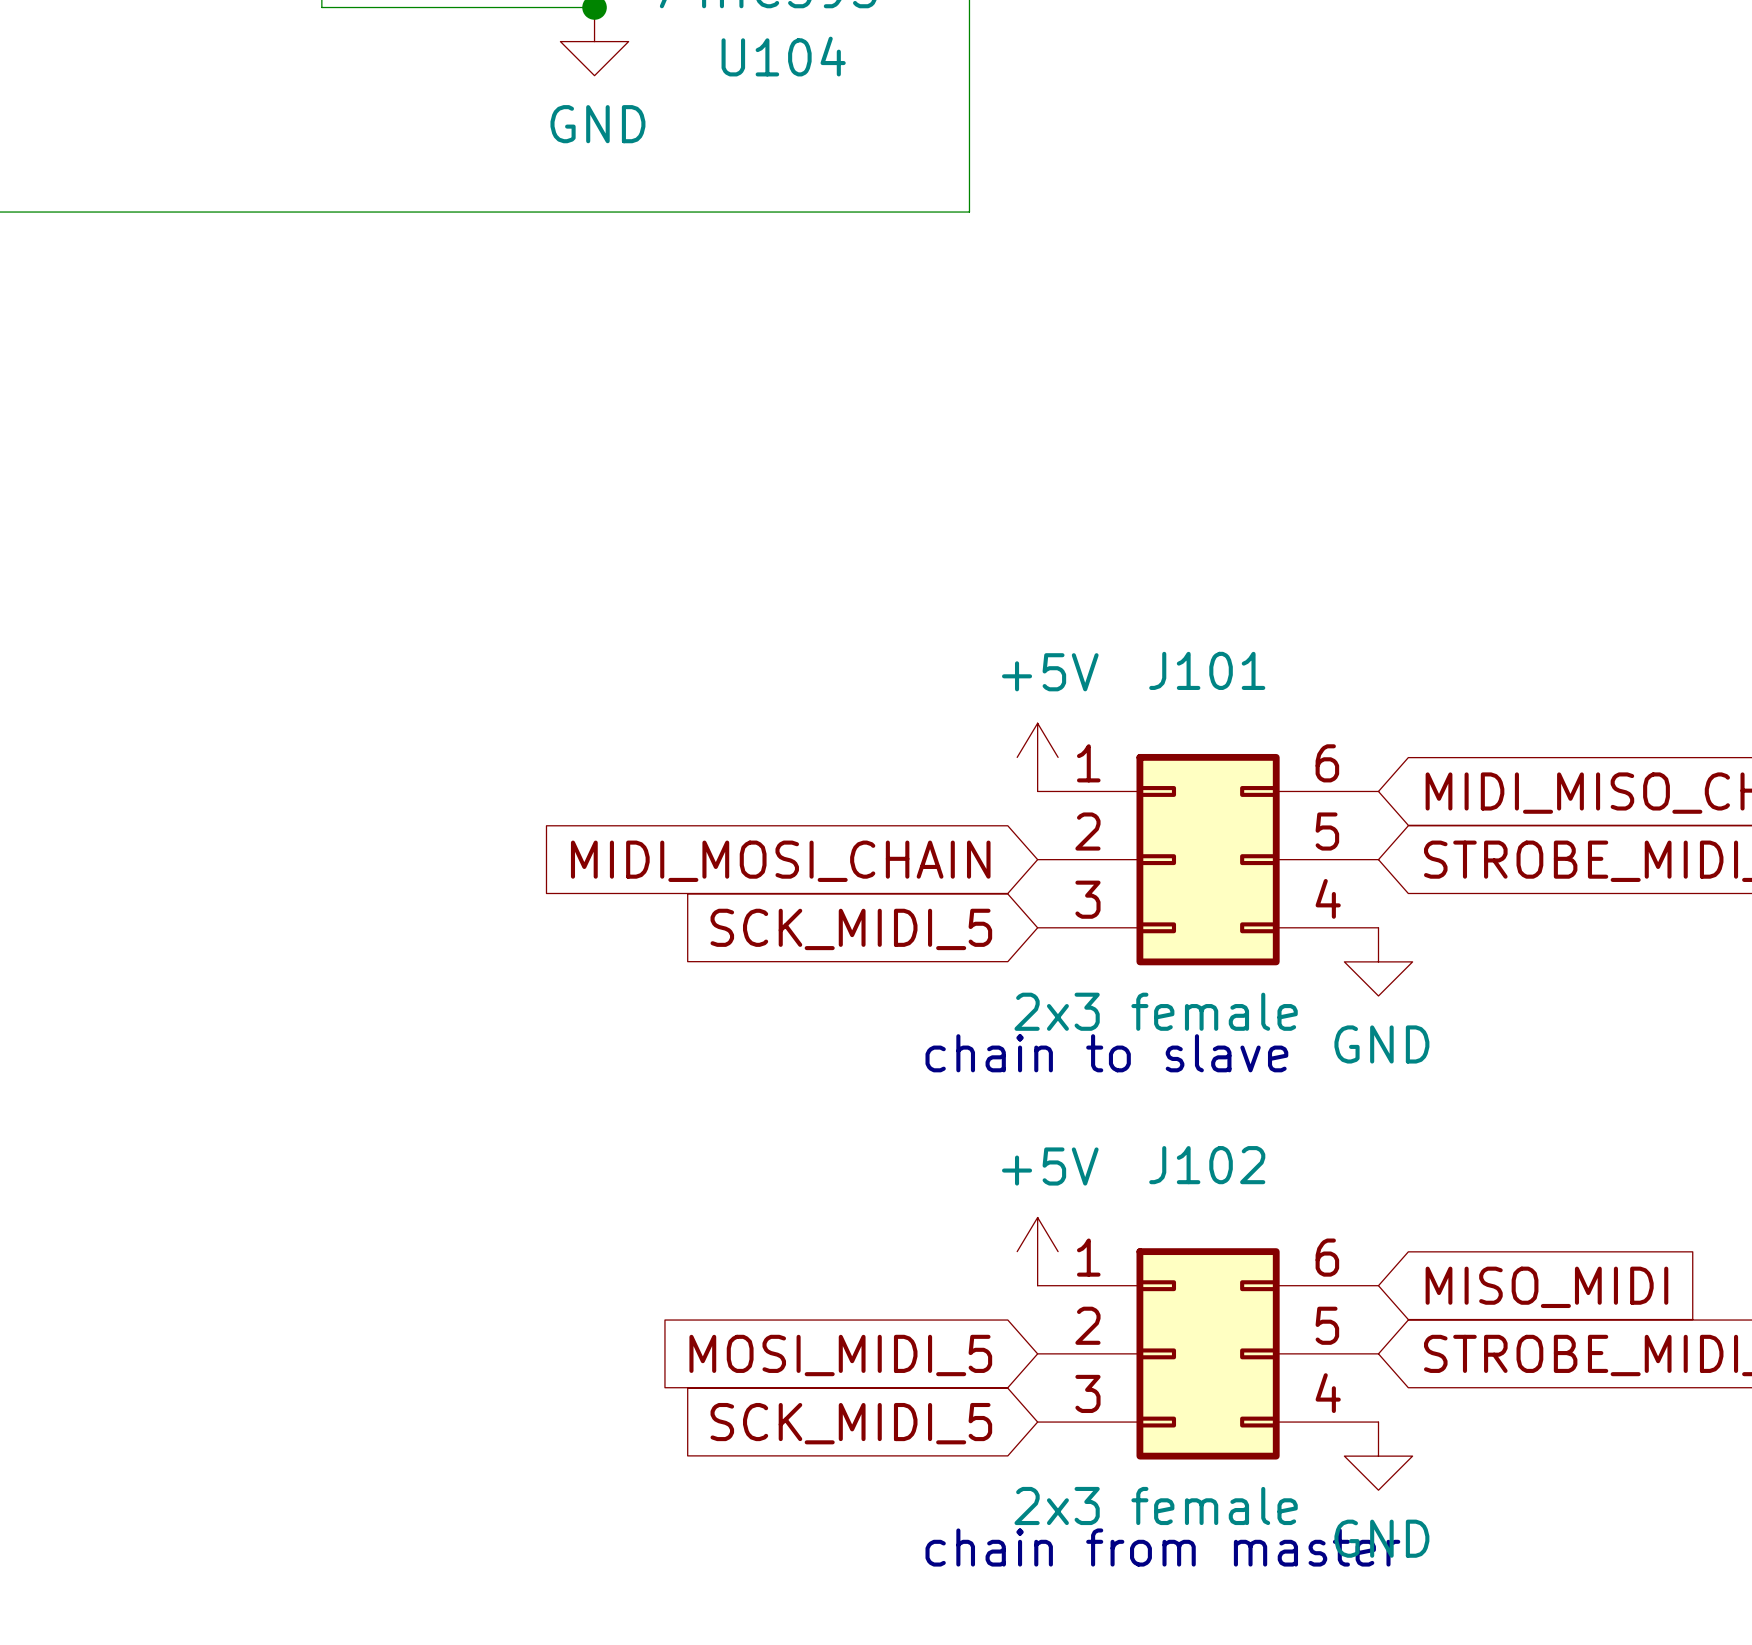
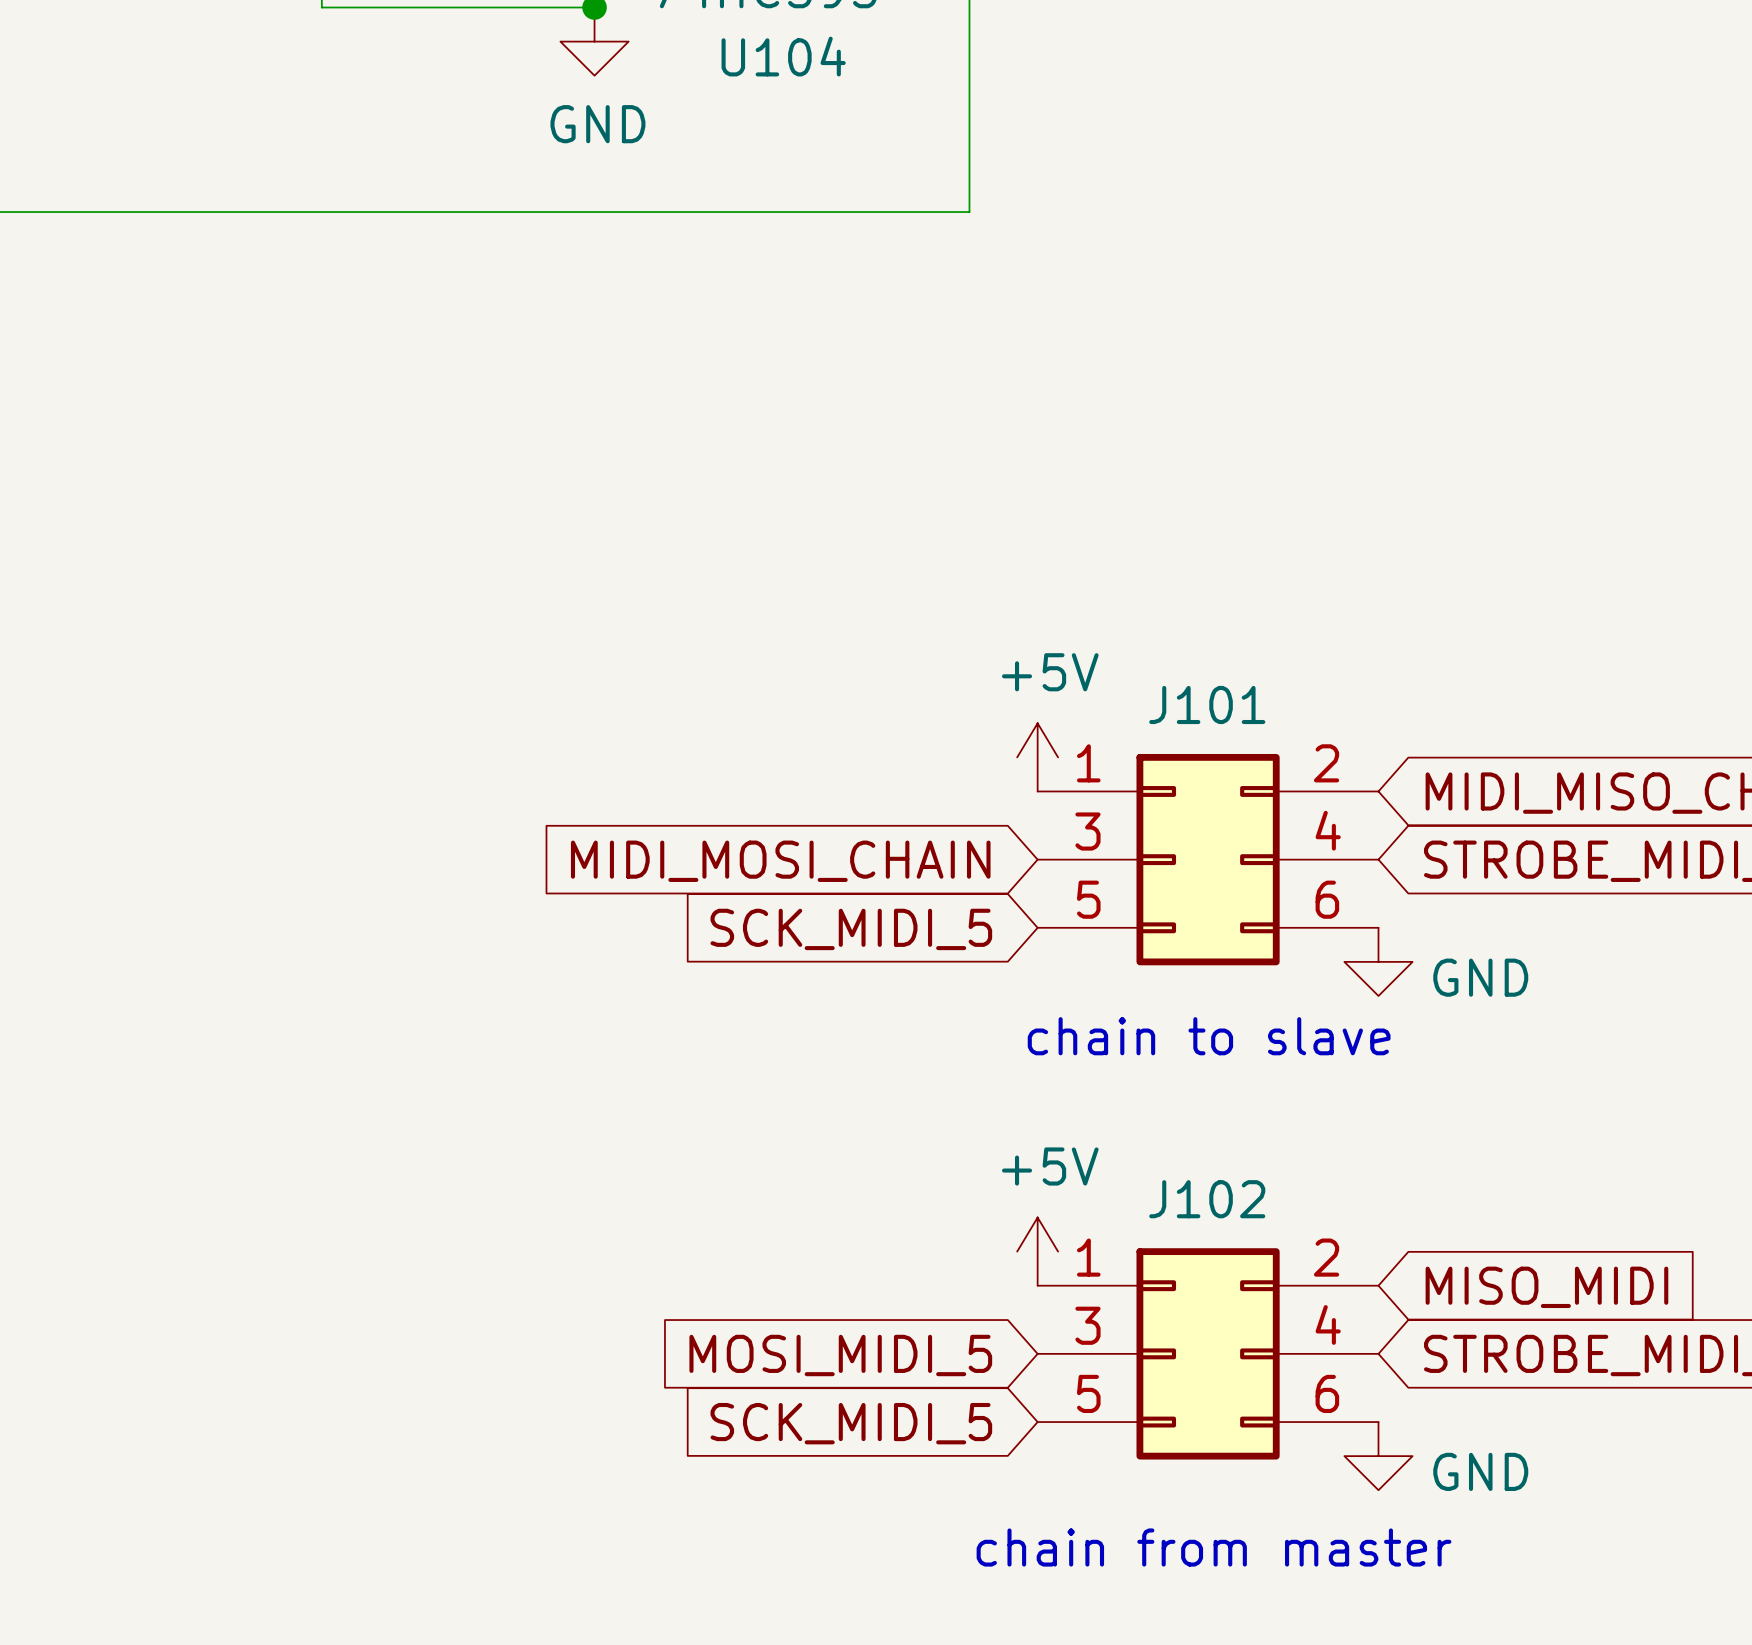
J101 name position: J101 (1207, 670) -> J101 (1207, 704)
J101 pin number: 6 (1327, 763) -> 2 (1326, 763)
J101 pin number: 2 (1087, 831) -> 3 (1087, 831)
J101 pin number: 5 (1327, 831) -> 4 (1328, 830)
J101 pin number: 4 (1328, 898) -> 6 (1327, 899)
J101 pin number: 3 (1087, 899) -> 5 (1088, 899)
J101 value: 2x3 female (1156, 1011) -> none
power symbol text position: GND (1381, 1044) -> GND (1480, 977)
text position: chain to slave (1106, 1053) -> chain to slave (1209, 1036)
J102 name position: J102 (1207, 1165) -> J102 (1207, 1199)
J102 pin number: 6 (1327, 1257) -> 2 (1326, 1257)
J102 pin number: 2 (1087, 1325) -> 3 (1087, 1325)
J102 pin number: 5 (1327, 1325) -> 4 (1328, 1324)
J102 pin number: 3 (1087, 1393) -> 5 (1088, 1393)
J102 pin number: 4 (1328, 1393) -> 6 (1327, 1393)
J102 value: 2x3 female (1156, 1505) -> none
power symbol text position: GND (1381, 1538) -> GND (1480, 1471)
text position: chain from master (1162, 1547) -> chain from master (1214, 1547)

